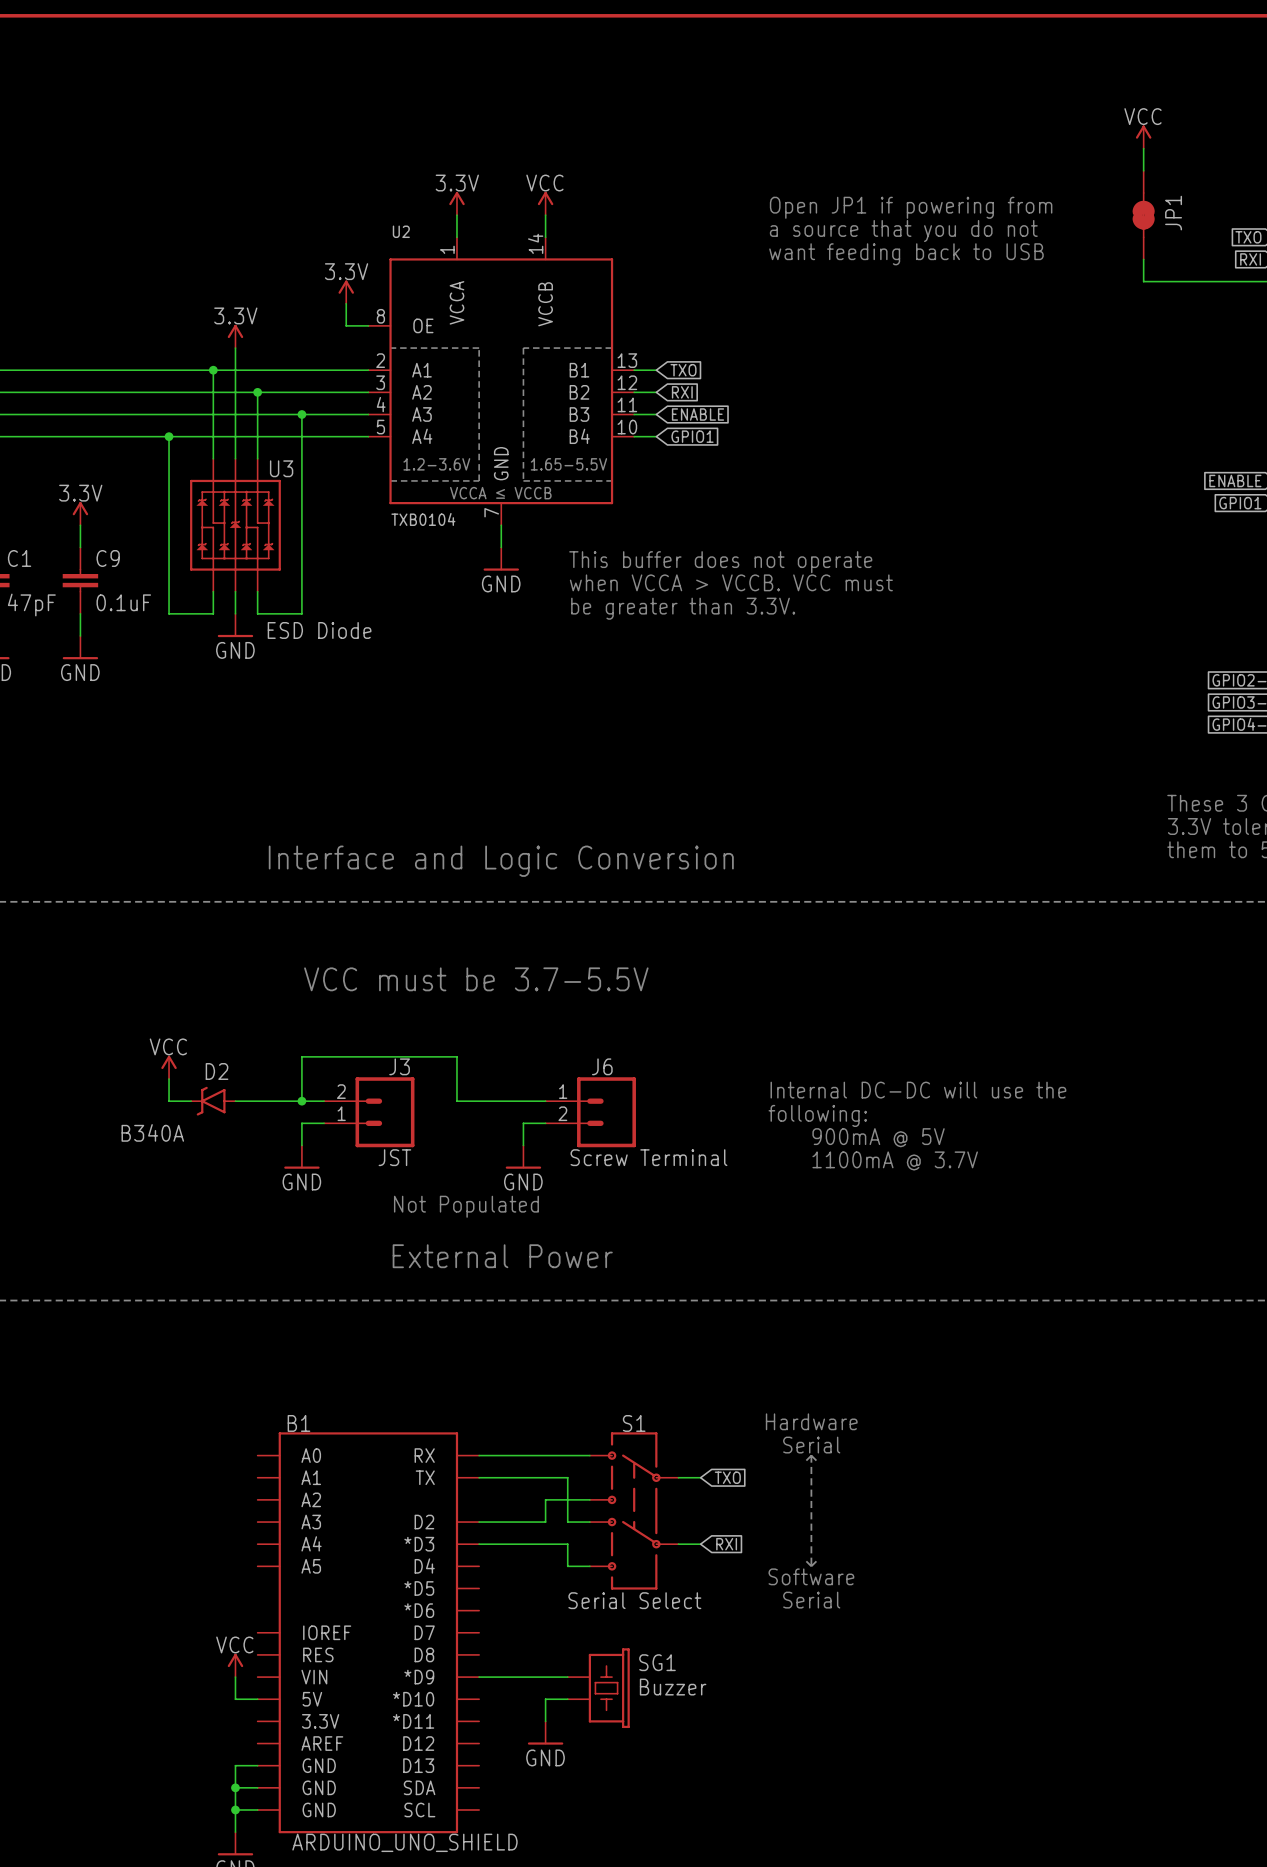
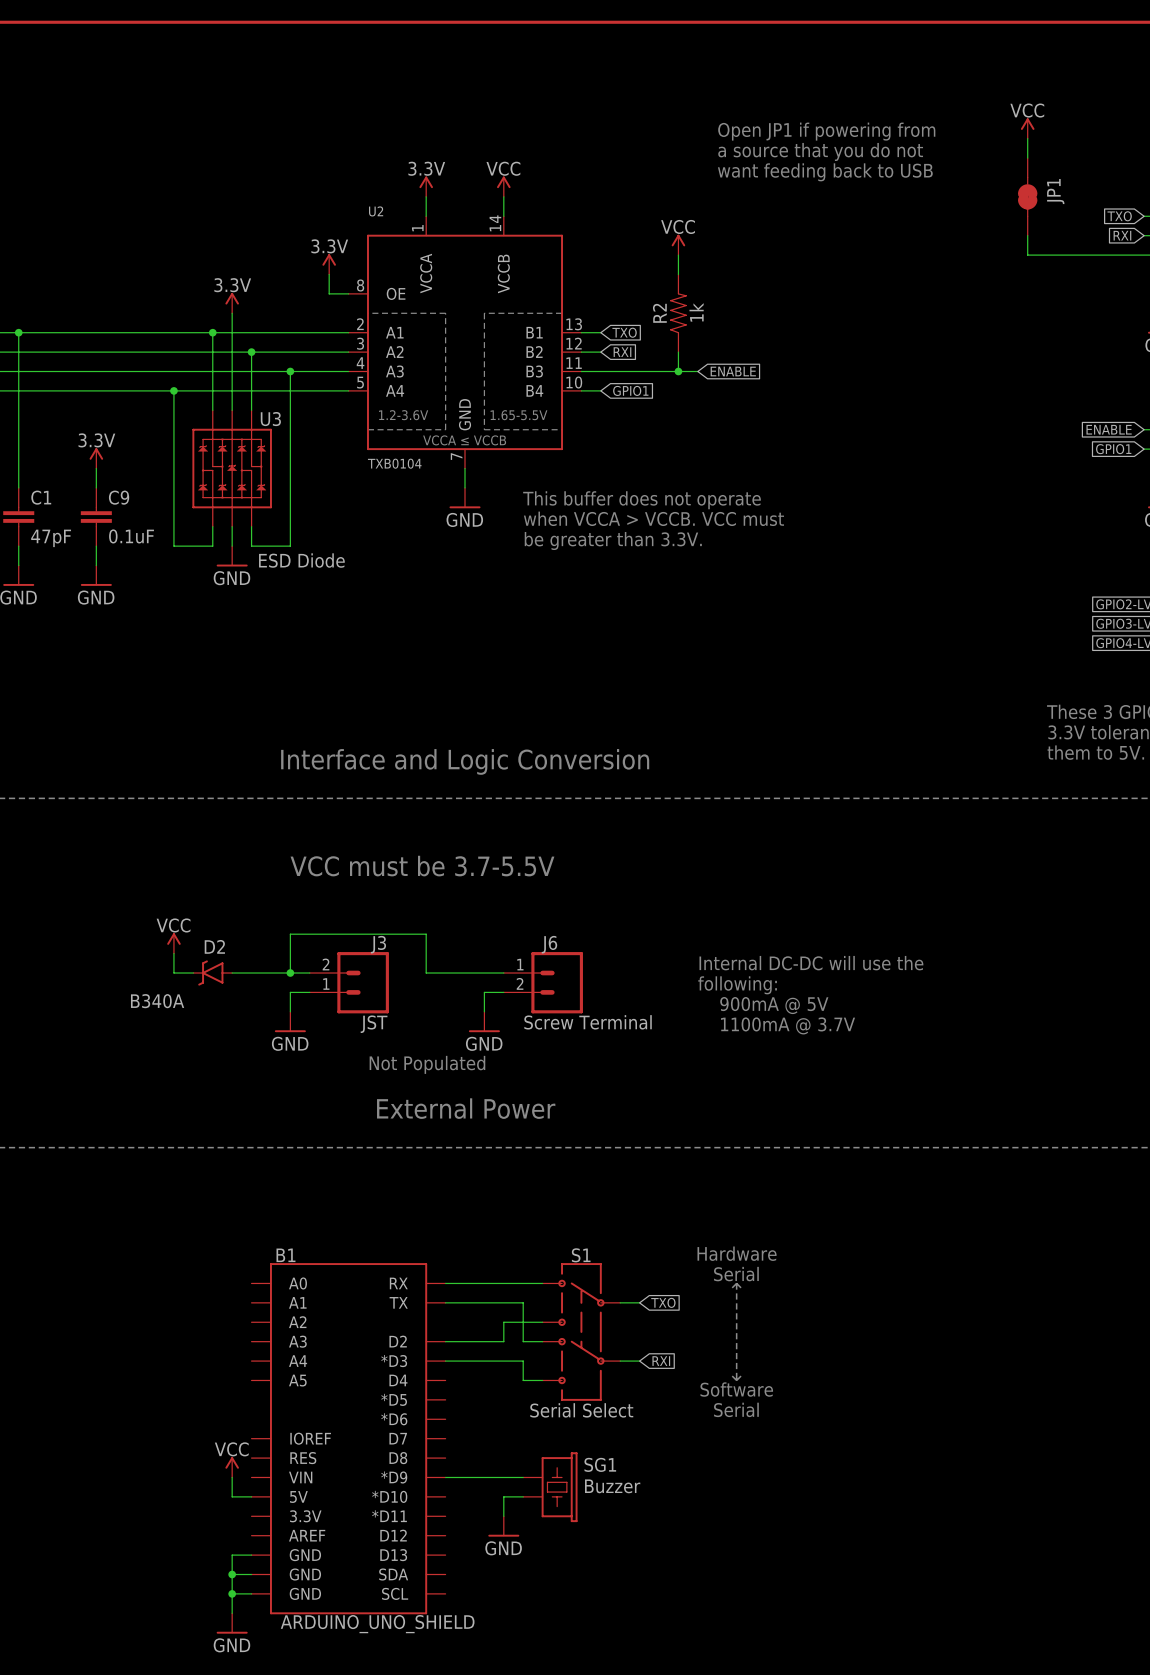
text position: Open JP1 if powering from (911, 207) -> Open JP1 if powering from (826, 131)
text position: a source that you do not (903, 231) -> a source that you do not (820, 151)
text position: want feeding back to USB (906, 254) -> want feeding back to USB (825, 172)
power symbol: none -> VCC (678, 244)
wire: none -> (678, 255) (678, 274)
R2: none -> 1k (678, 313)
wire: none -> (678, 352) (678, 371)
wire: none -> (600, 371) (697, 371)
global label position: ENABLE (697, 414) -> ENABLE (733, 371)
junction: none -> (678, 371)

